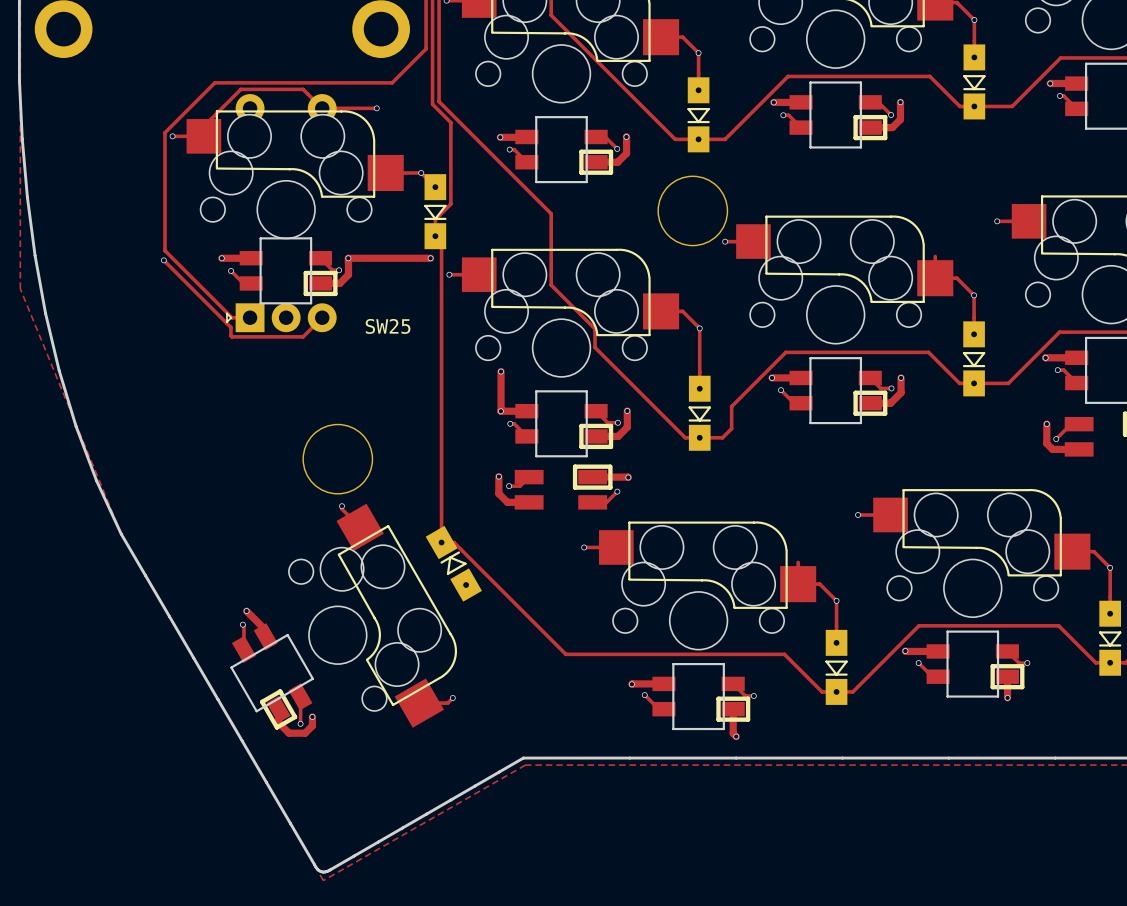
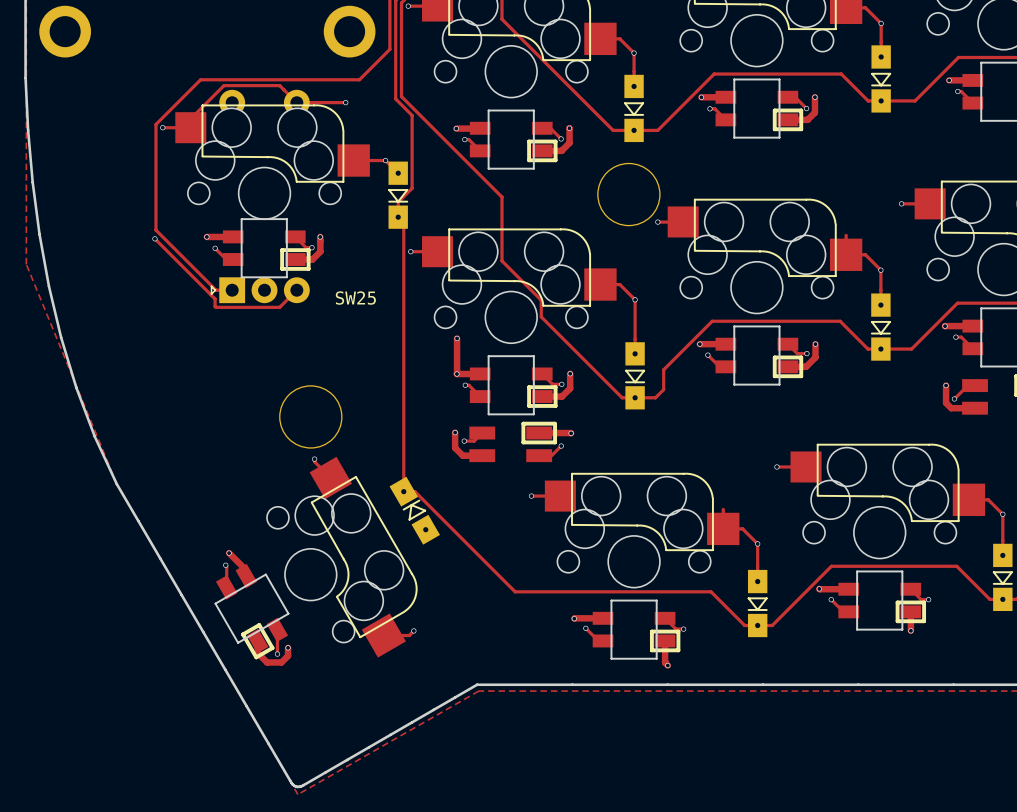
track: (348, 258) (430, 258) -> none
via: (430, 258) -> none

